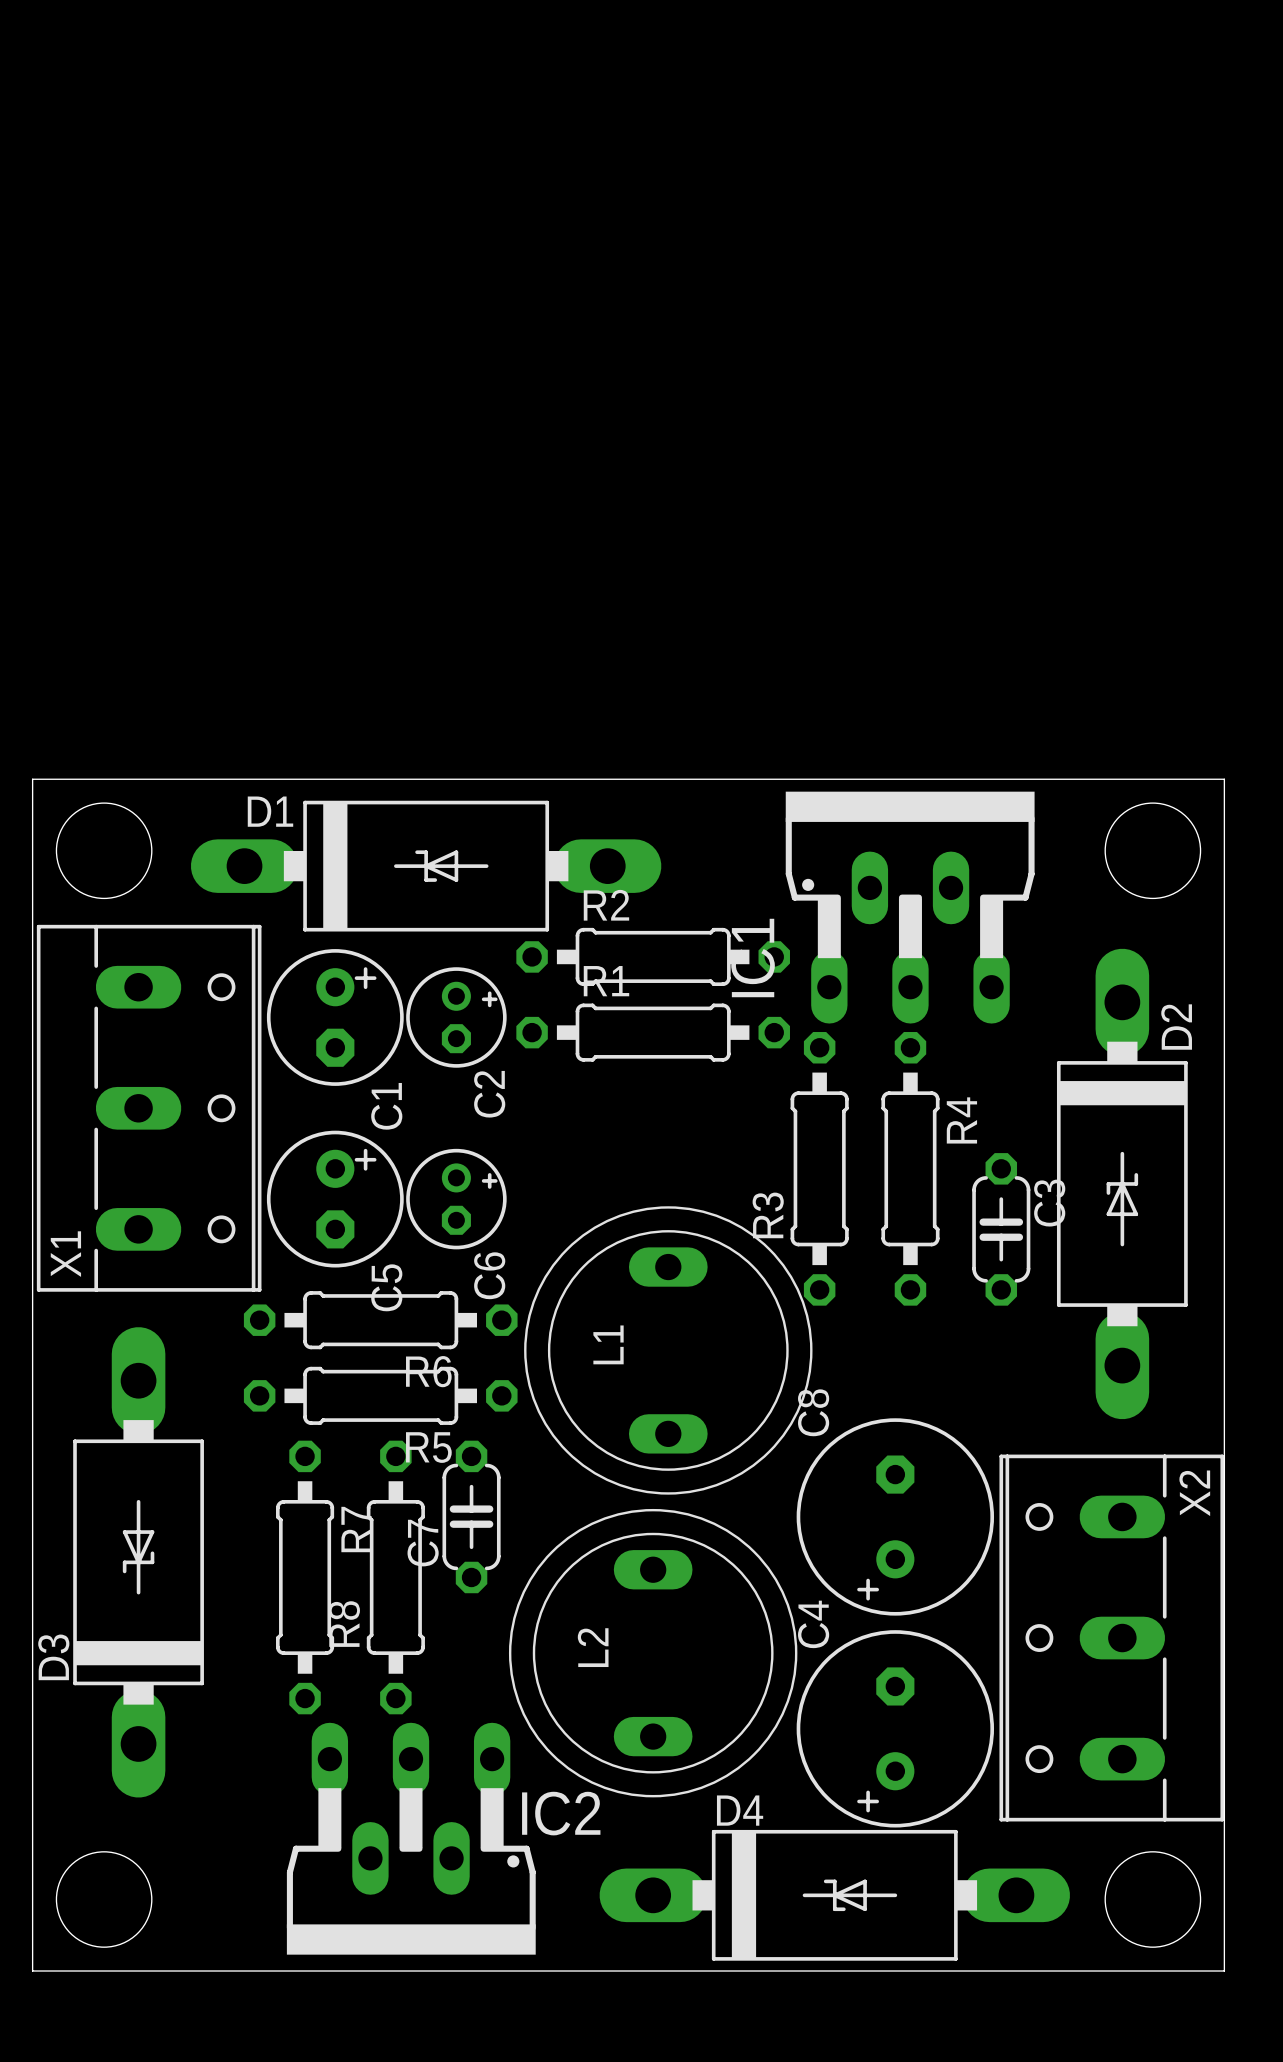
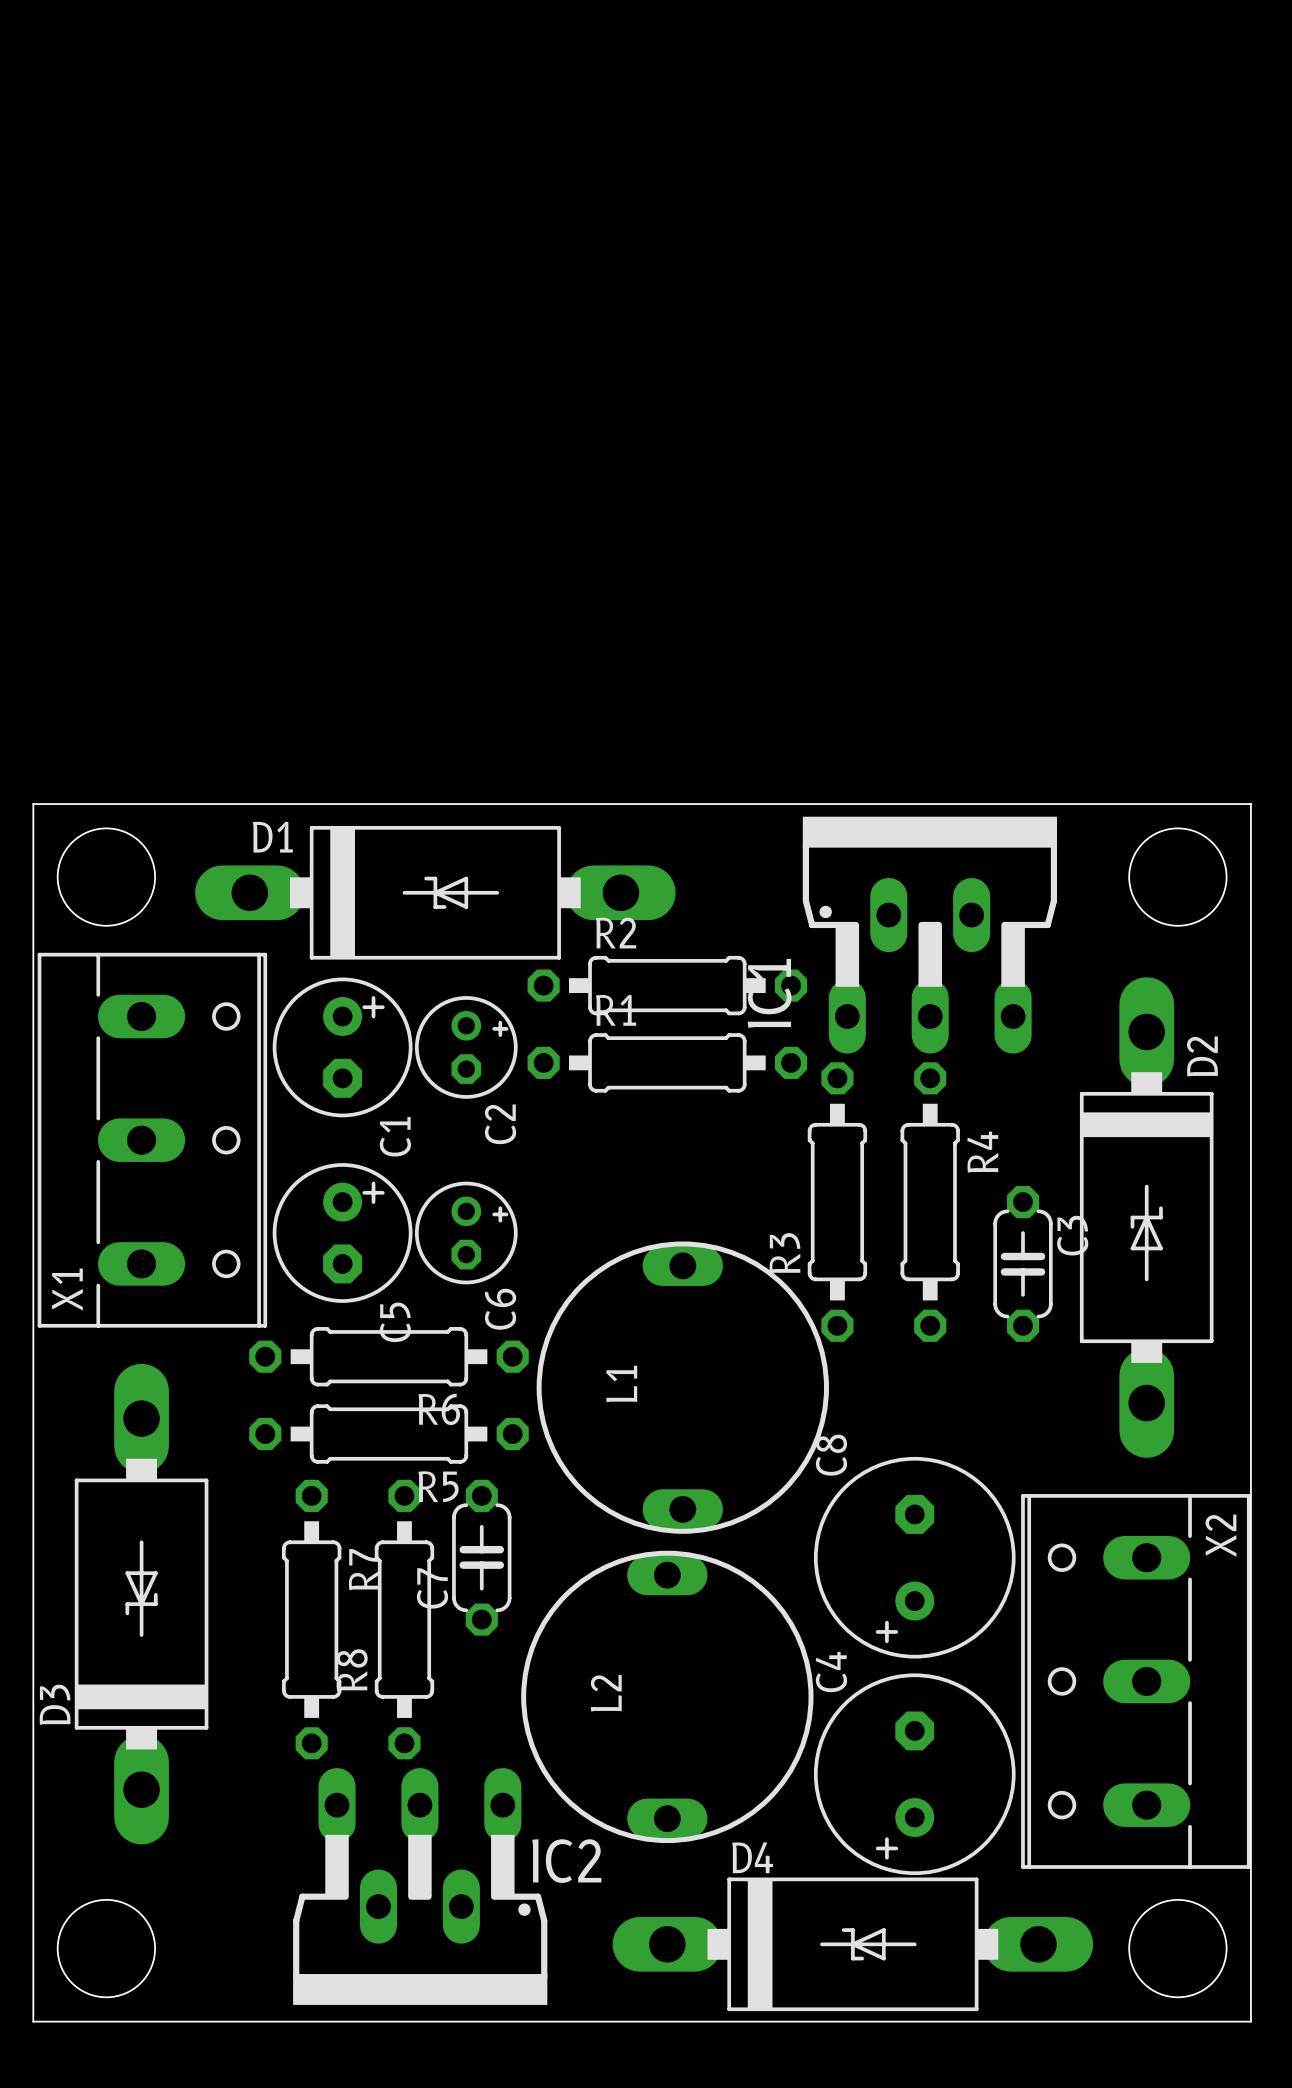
L1 footprint: [524, 1206, 813, 1495] -> [536, 1241, 829, 1534]
L2 footprint: [508, 1508, 798, 1798] -> [521, 1550, 814, 1844]

